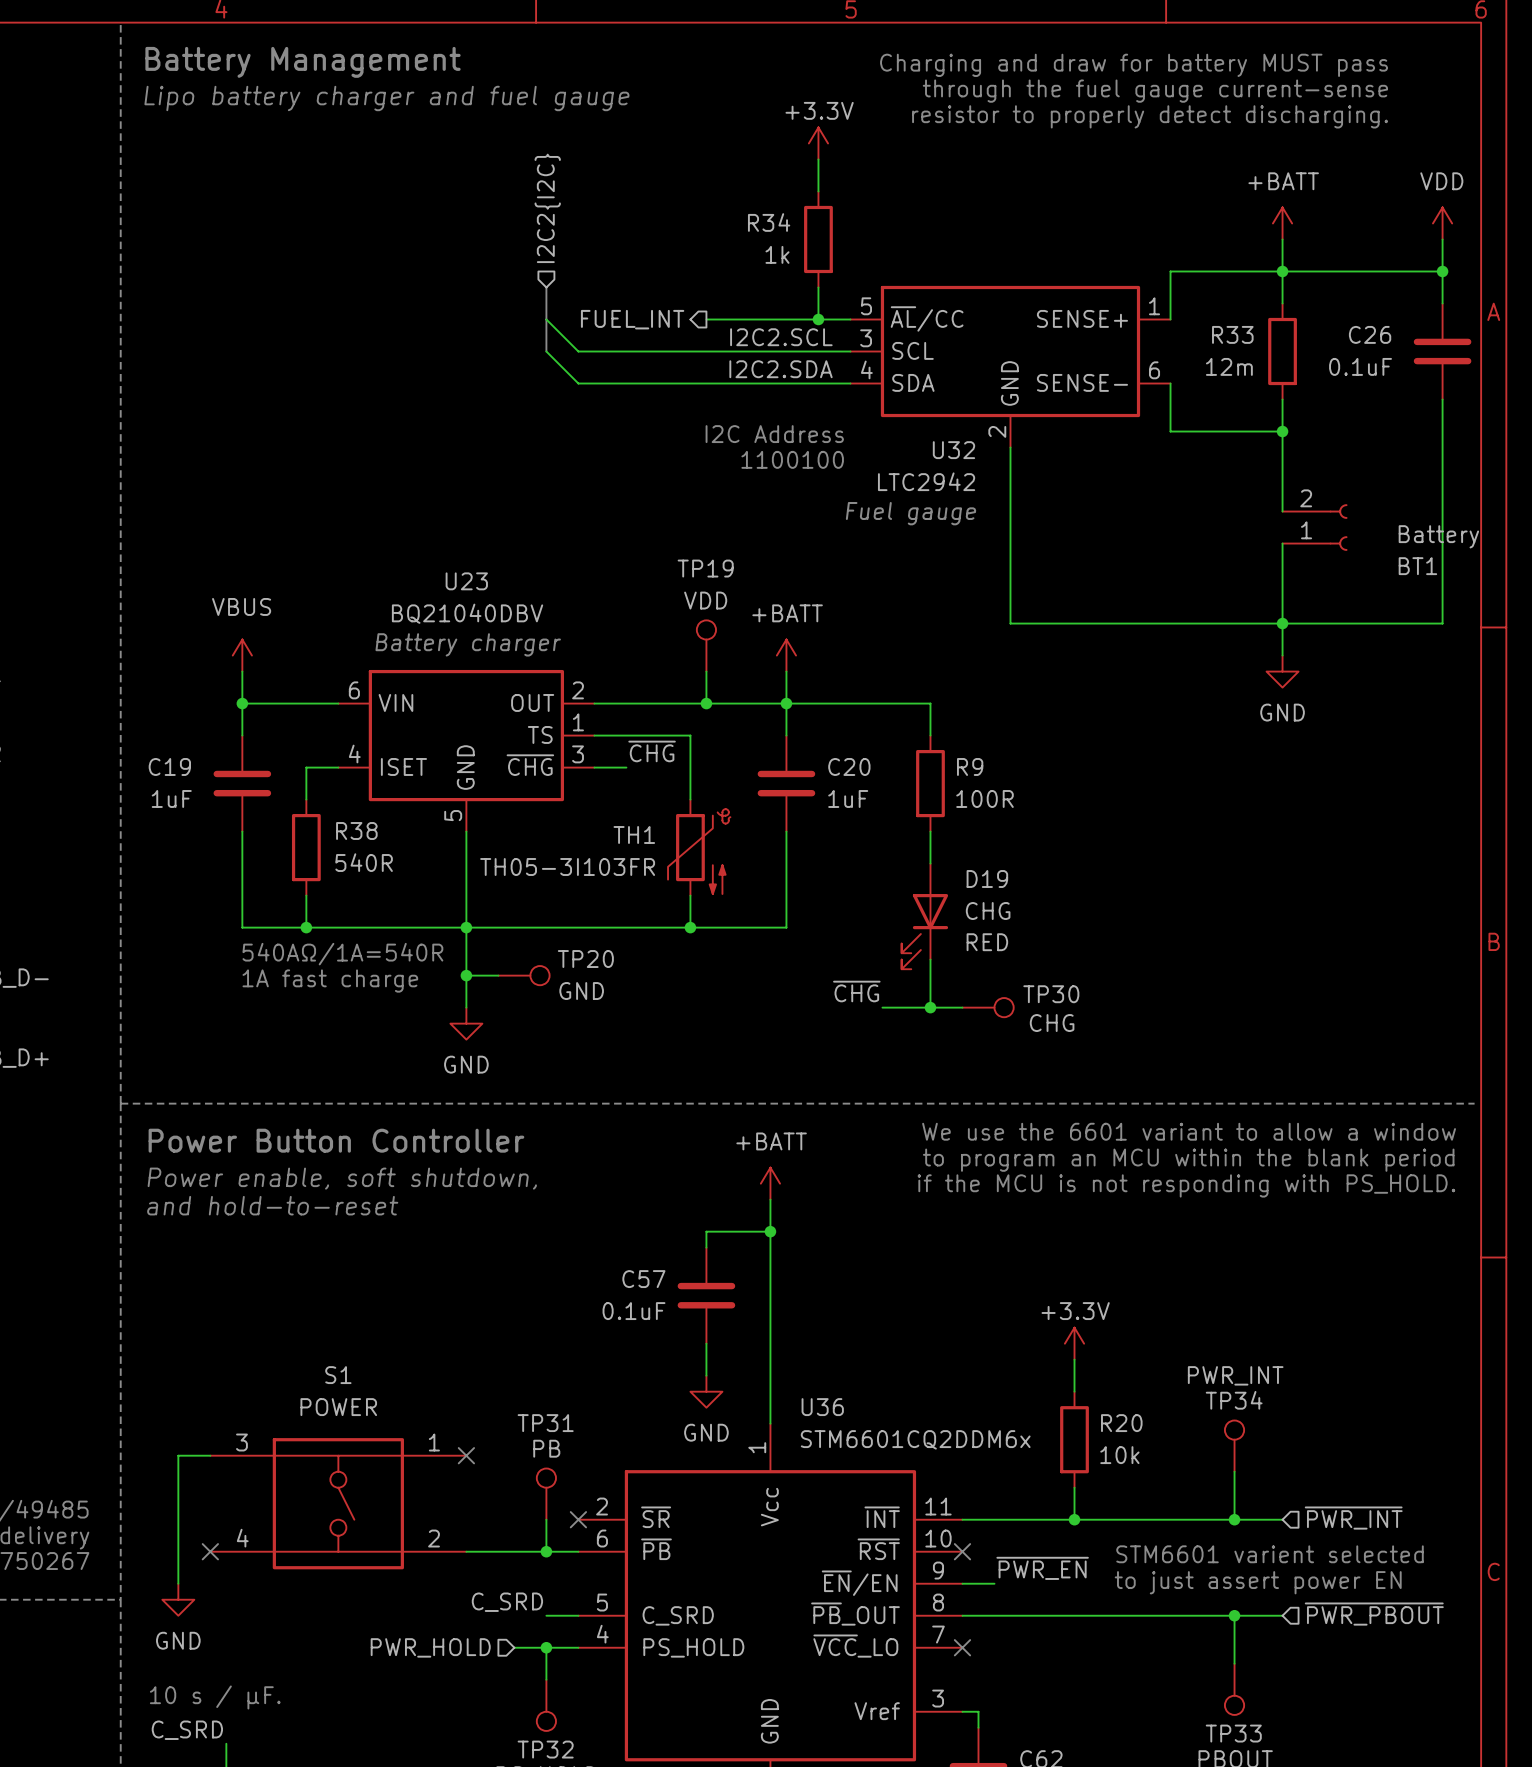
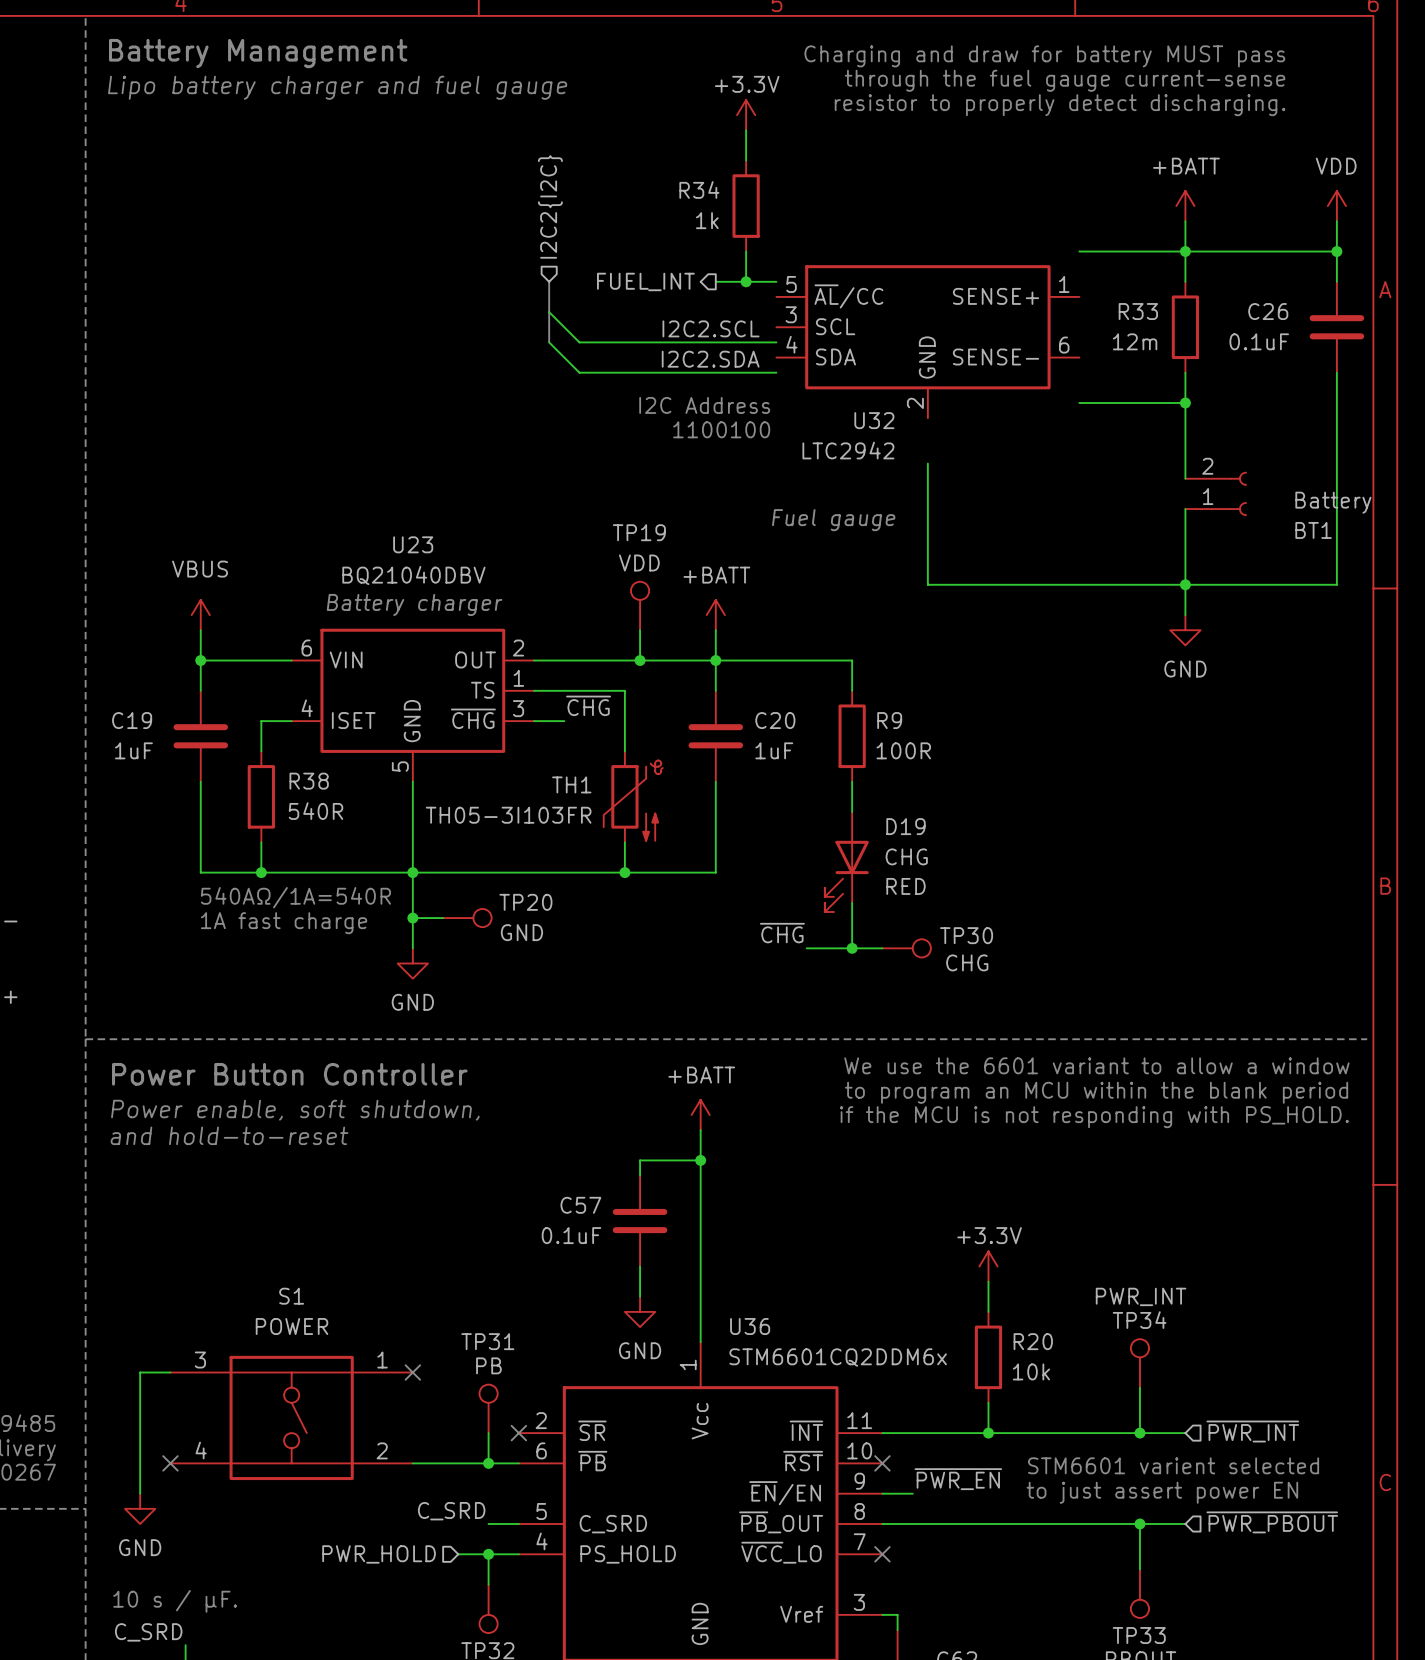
power symbol position: +3.3V (818, 143) -> +3.3V (746, 115)
hierarchical label position: I2C2{I2C} (547, 208) -> I2C2{I2C} (550, 206)
R34 position: (818, 239) -> (746, 206)
wire: (1170, 271) (1170, 319) -> none
bus: (546, 287) (546, 351) -> (549, 281) (549, 342)
wire: none -> (715, 281) (776, 281)
wire: (546, 319) (578, 351) (850, 351) -> none
hierarchical label position: FUEL_INT (632, 319) -> FUEL_INT (645, 281)
wire: (706, 319) (850, 319) -> none
junction position: (818, 319) -> (746, 281)
wire: none -> (549, 312) (579, 342) (776, 342)
label position: I2C2.SCL (781, 337) -> I2C2.SCL (711, 328)
wire: (546, 351) (578, 383) (850, 383) -> none
wire: none -> (549, 342) (579, 372) (776, 372)
label position: I2C2.SDA (780, 369) -> I2C2.SDA (710, 359)
wire: (1170, 383) (1170, 431) -> none
wire: (1010, 447) (1010, 495) -> none
text position: Fuel gauge (911, 513) -> Fuel gauge (833, 520)

